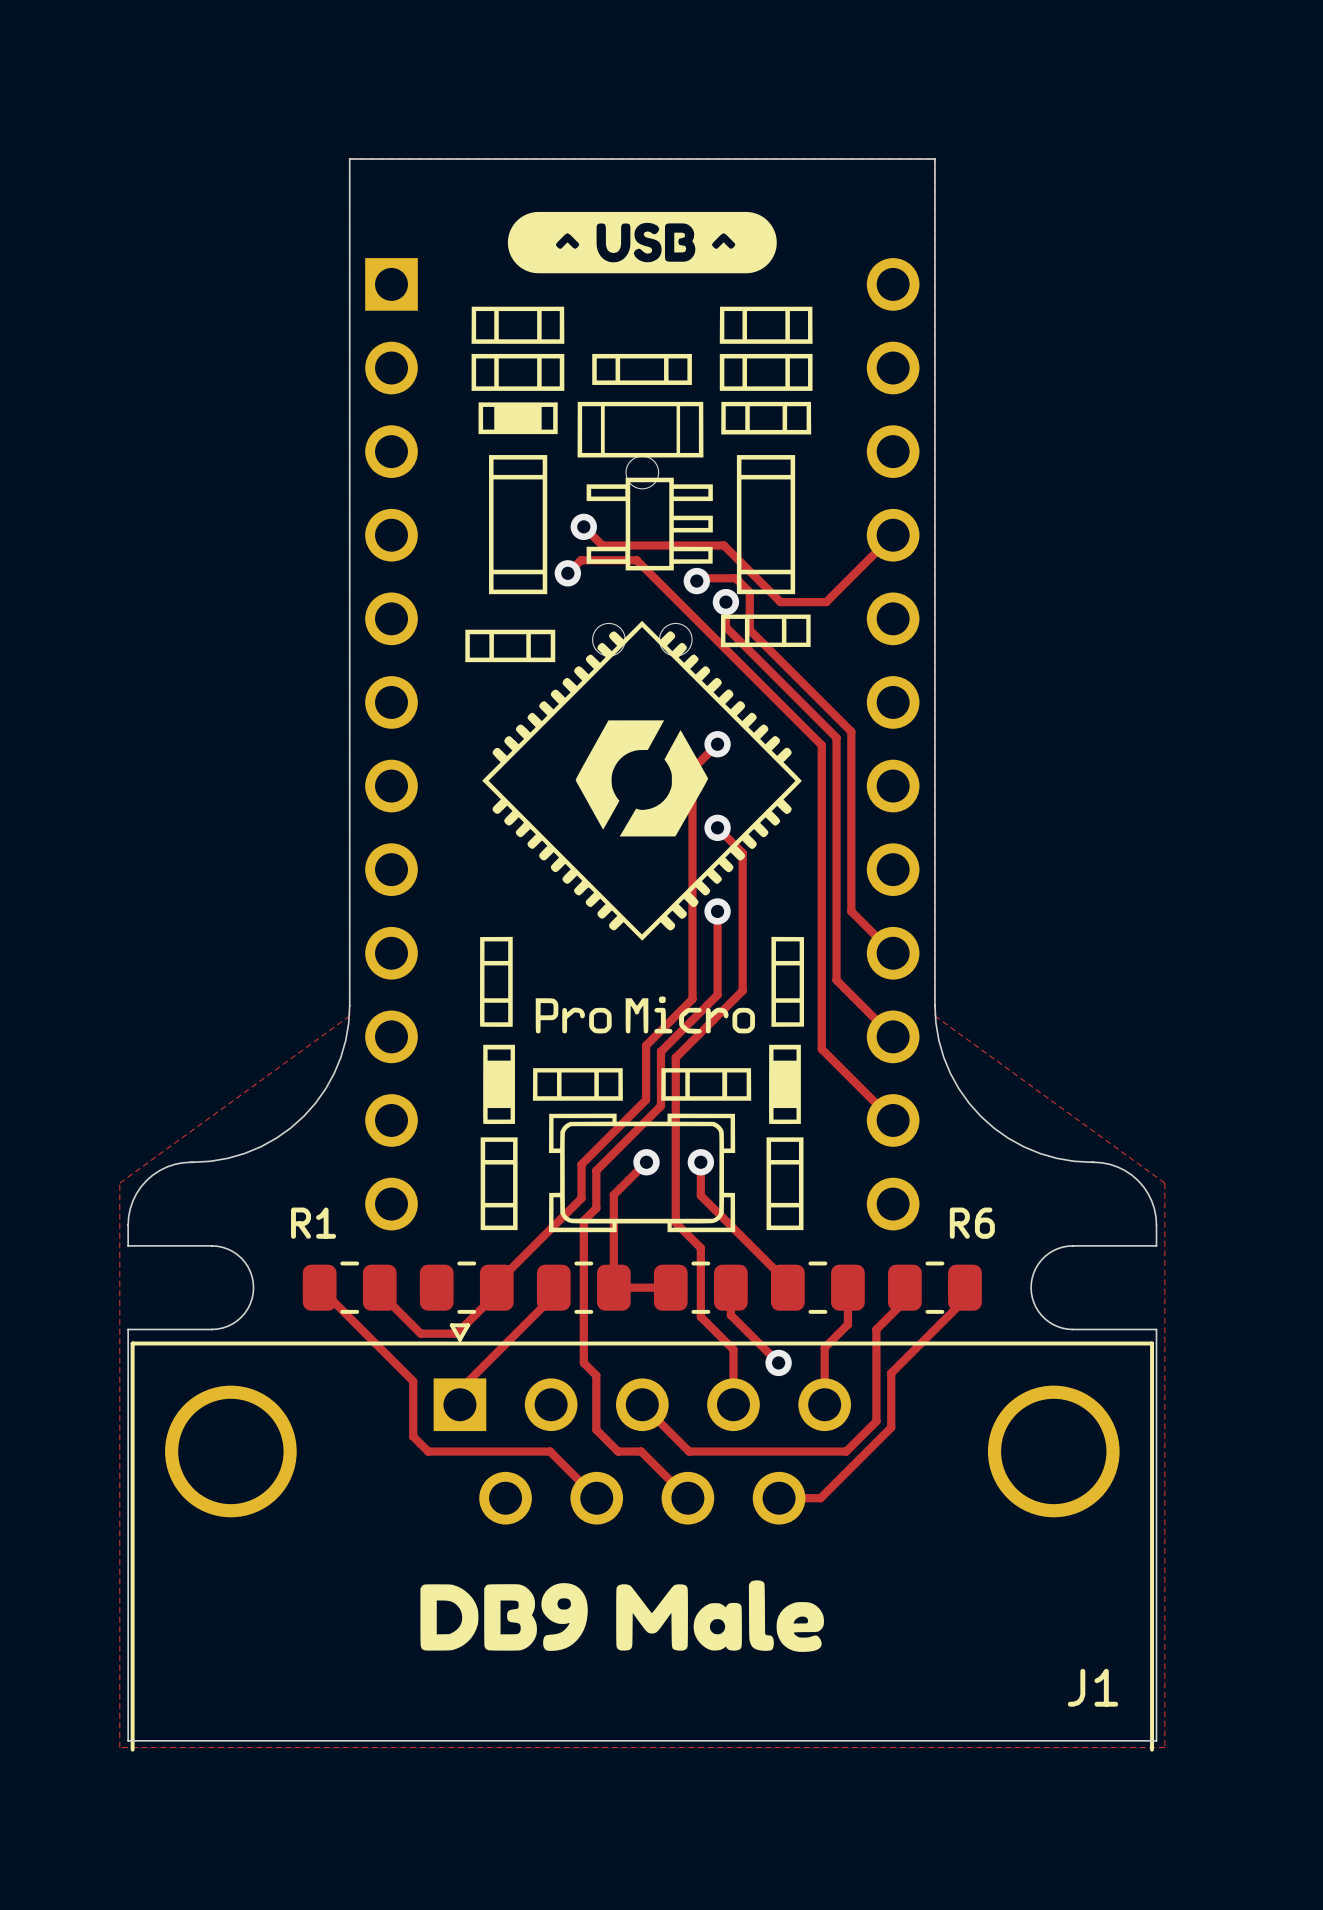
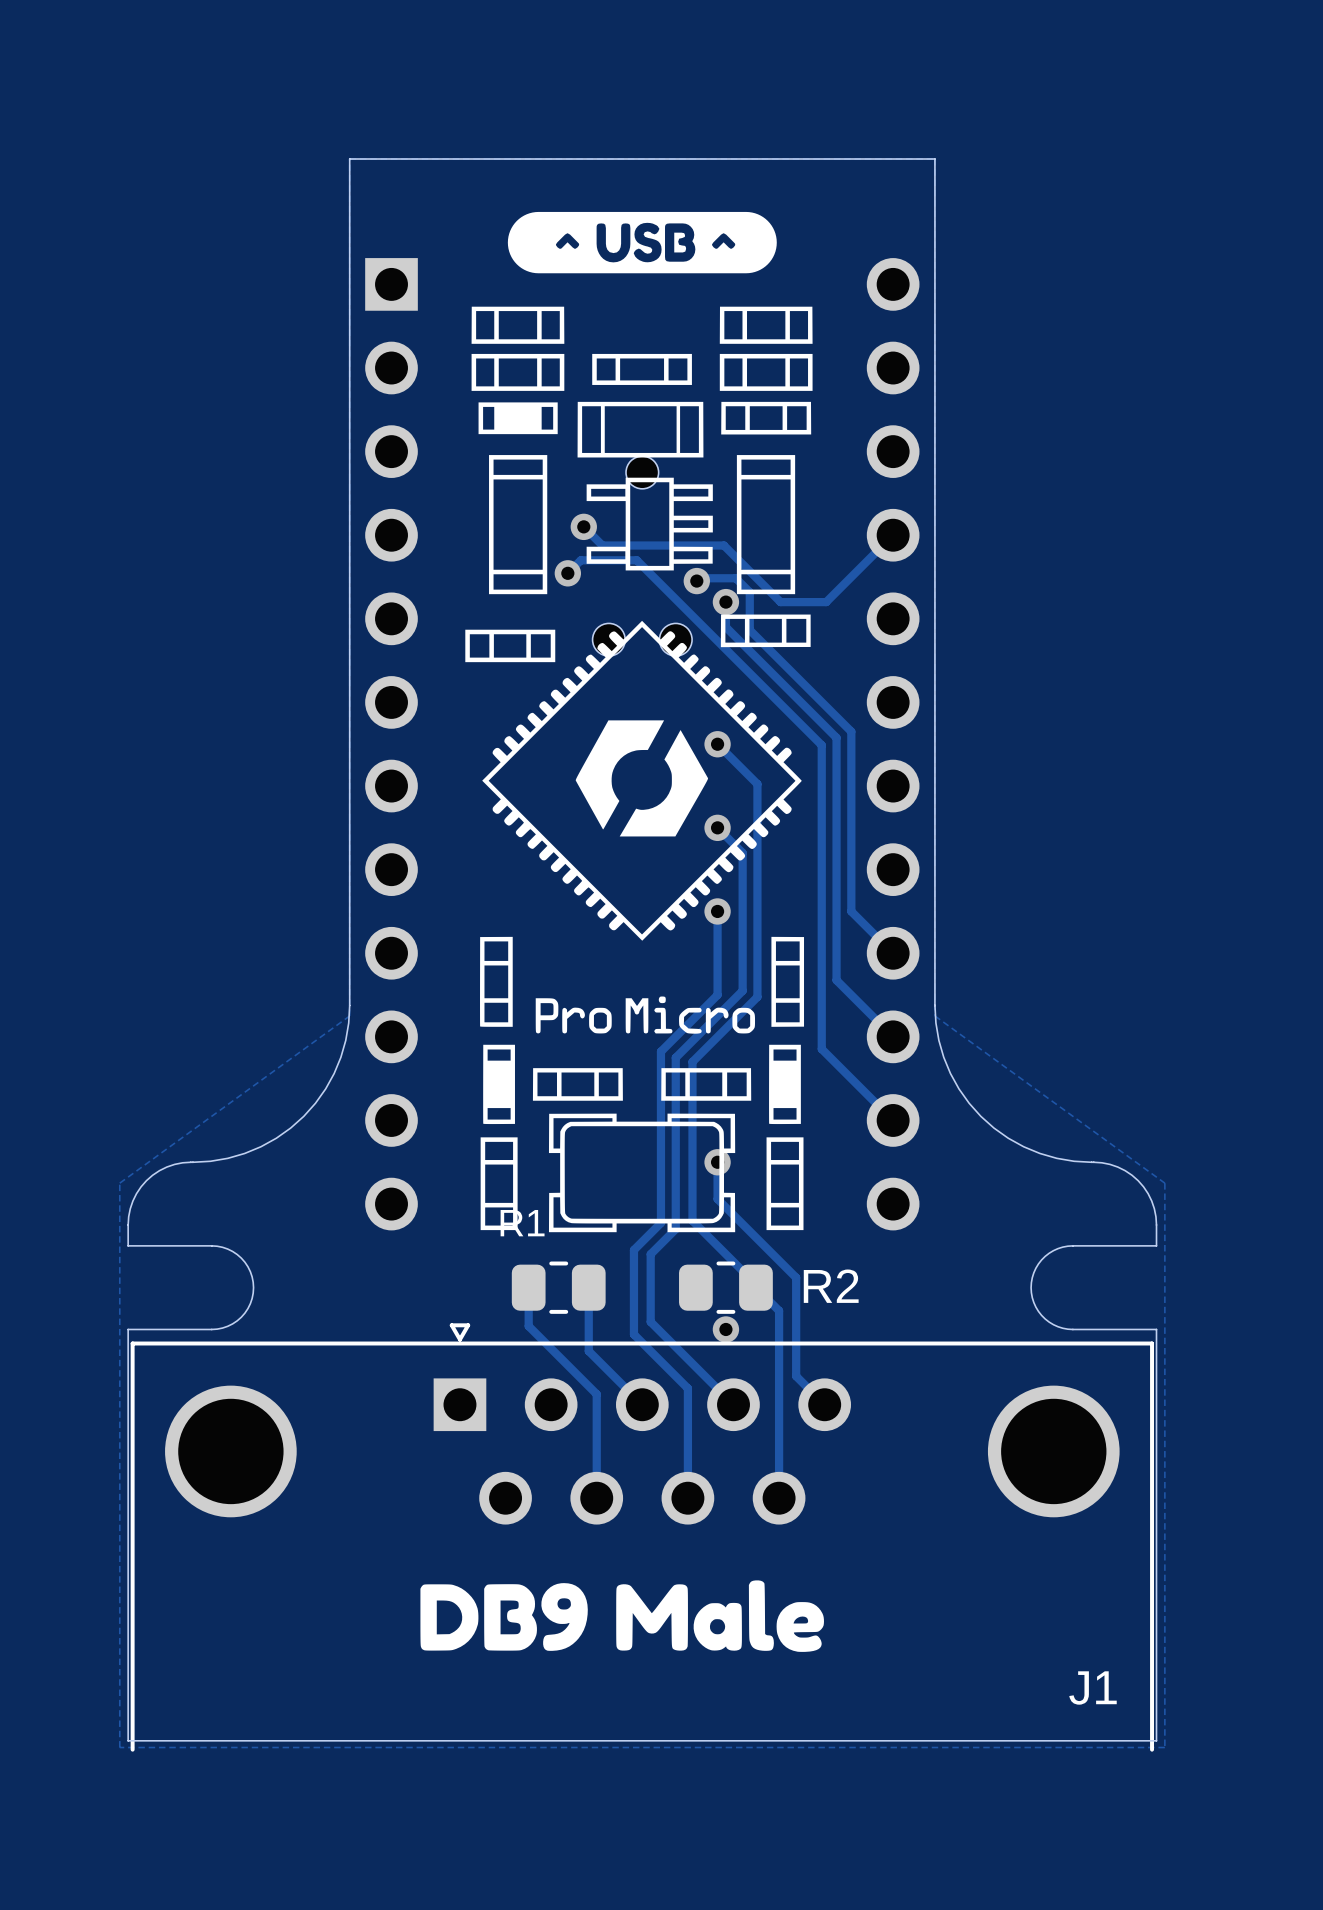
track: (717, 744) (692, 769) (692, 999) (646, 1045) (646, 1099) (581, 1164) (581, 1198) (496, 1283) (496, 1293) (456, 1333) (420, 1333) (379, 1292) (379, 1287) -> (717, 744) (757, 784) (757, 996) (692, 1061) (692, 1220) (755, 1284) (755, 1287) (779, 1310) (779, 1498)
track: (660, 1106) (596, 1170) (596, 1208) (583, 1220) (583, 1362) (596, 1375) (596, 1429) (618, 1451) (641, 1451) (687, 1498) -> (660, 1106) (660, 1223) (633, 1250) (633, 1334) (687, 1388) (687, 1498)
track: (646, 1162) (613, 1194) (613, 1287) (670, 1287) -> none
via: (646, 1162) -> none
track: (700, 1162) (700, 1195) (787, 1282) (787, 1287) -> none
via position: (700, 1162) -> (717, 1162)
track: (675, 1222) (700, 1247) (700, 1316) (733, 1349) (733, 1404) -> (675, 1222) (675, 1229) (650, 1254) (650, 1321) (733, 1404)
R2 name: none -> R2 (831, 1286)
track: (319, 1287) (413, 1381) (413, 1436) (428, 1451) (550, 1451) (596, 1498) -> (528, 1287) (528, 1326) (596, 1394) (596, 1498)
R1 position: (349, 1287) -> (558, 1287)
part: (466, 1287) -> none
track: (553, 1287) (553, 1295) (459, 1389) (459, 1404) -> none
part: (583, 1287) -> none
R2 position: (700, 1287) -> (725, 1287)
track: (730, 1287) (730, 1315) (778, 1362) -> none
part: (817, 1287) -> none
track: (847, 1287) (847, 1324) (824, 1347) (824, 1404) -> (717, 1162) (717, 1199) (796, 1277) (796, 1376) (824, 1404)
track: (904, 1287) (904, 1300) (876, 1329) (876, 1421) (846, 1451) (689, 1451) (642, 1404) -> (588, 1287) (588, 1351) (642, 1404)
R6: (934, 1287) -> none
track: (964, 1287) (964, 1299) (891, 1373) (891, 1427) (820, 1498) (779, 1498) -> none
via position: (778, 1362) -> (725, 1329)

